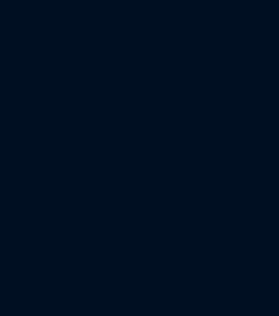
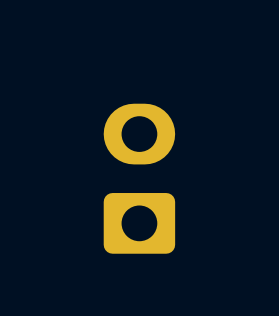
part: none -> (139, 178)

